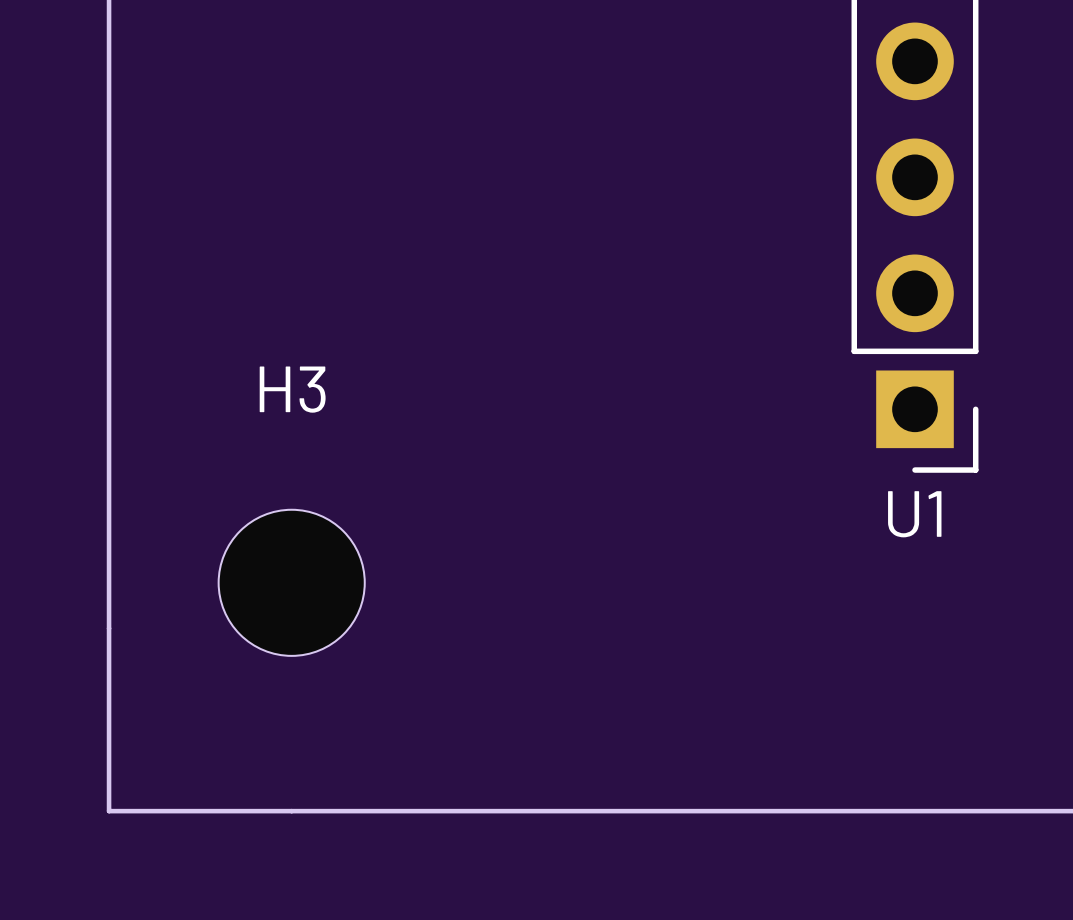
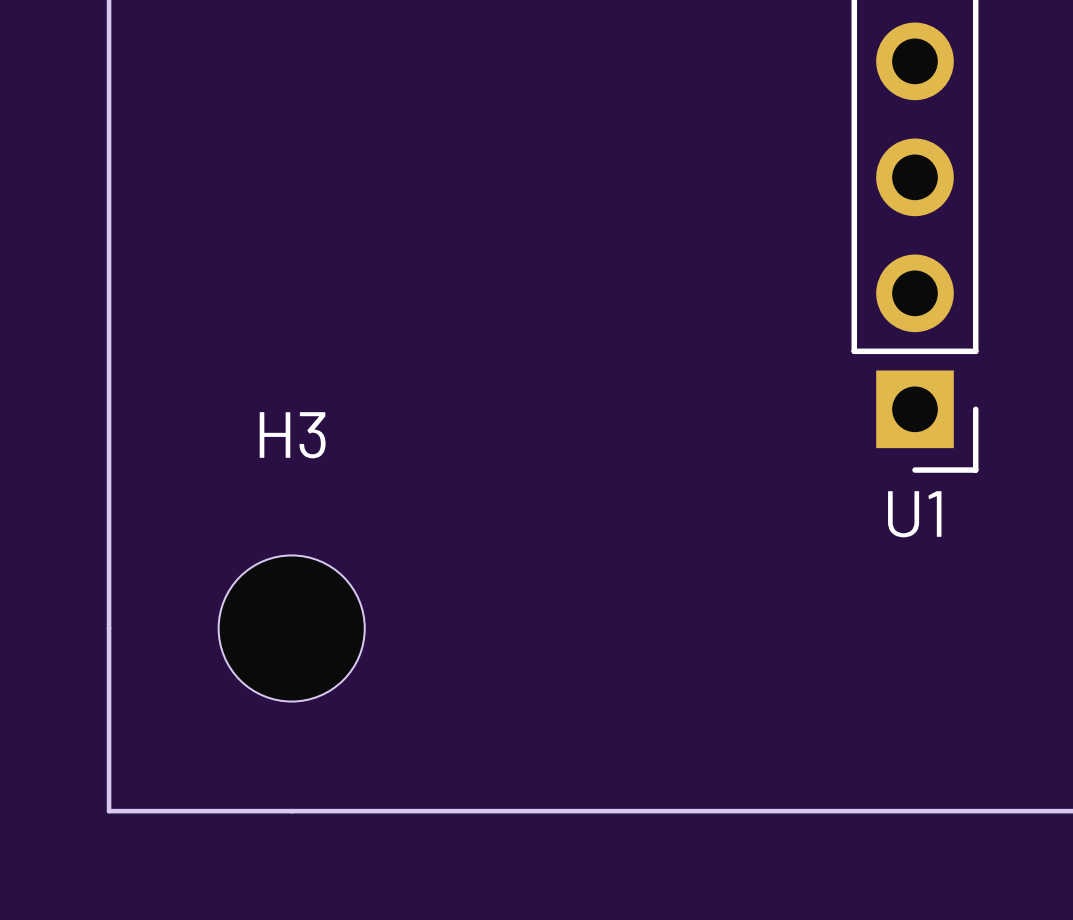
H3 position: (291, 582) -> (291, 628)

